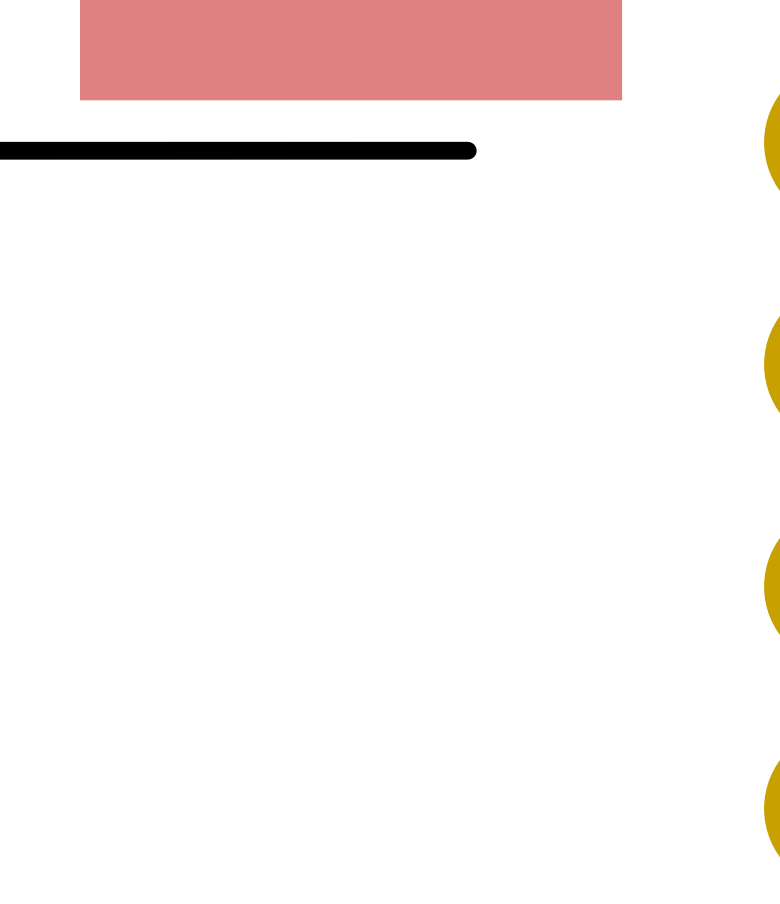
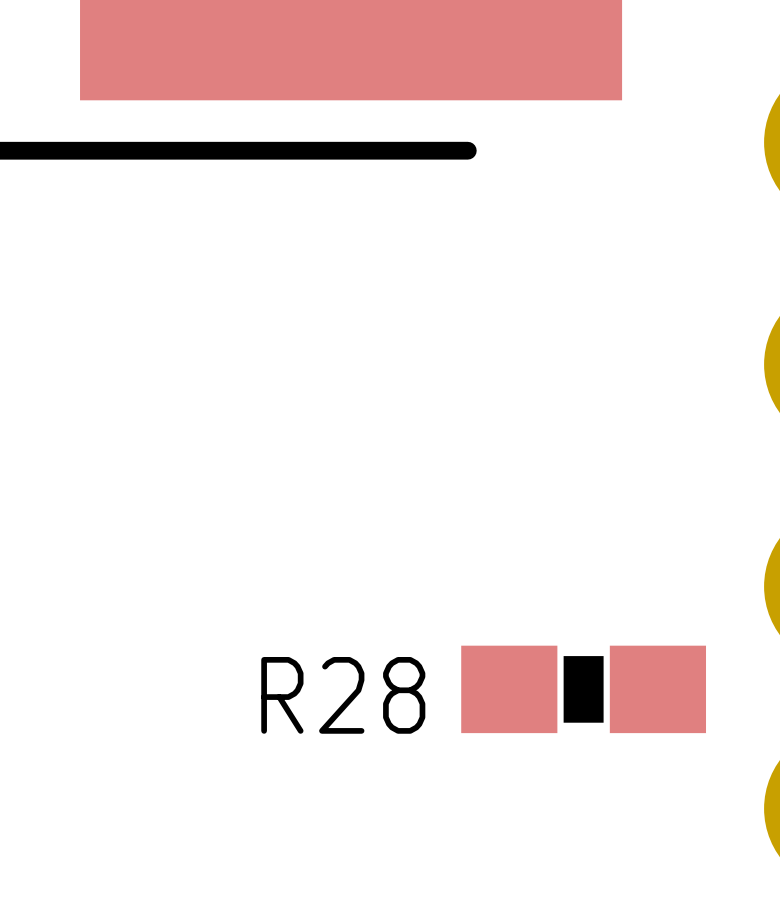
R28: none -> (583, 689)

